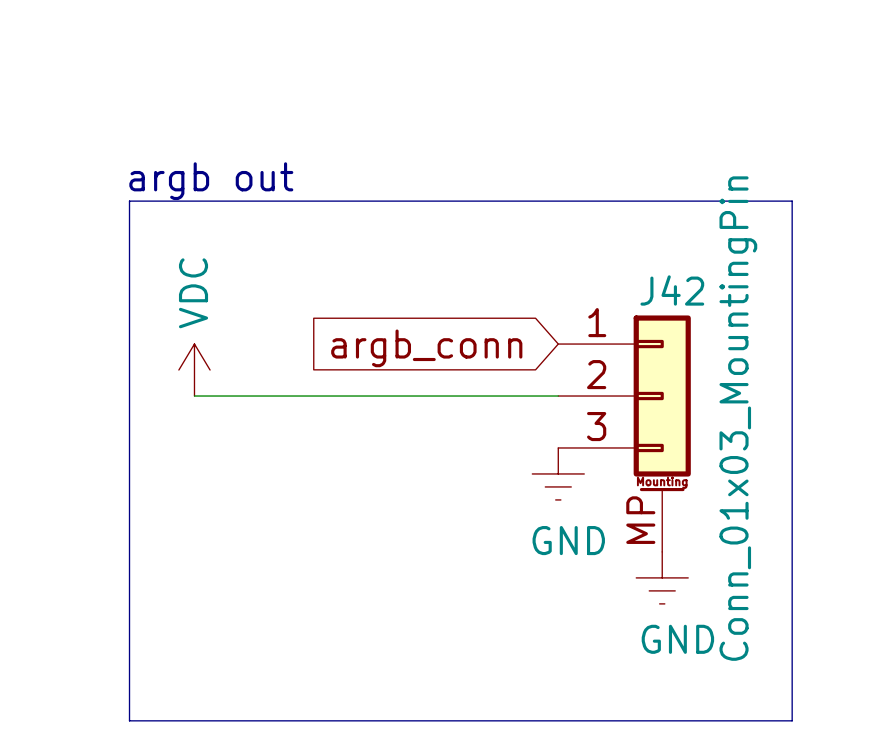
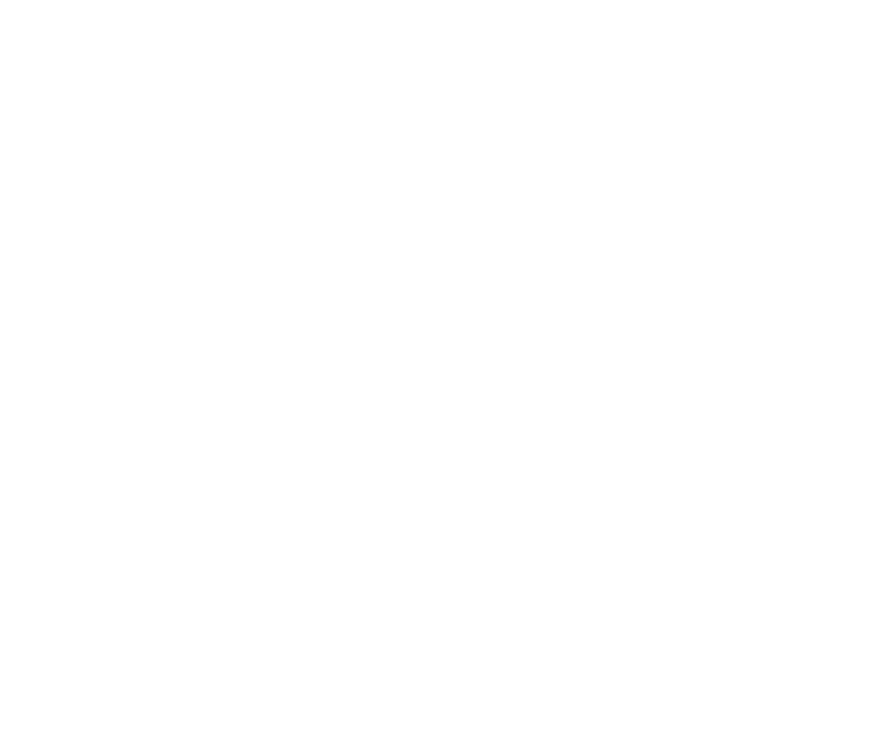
text: argb out (211, 181) -> none
line: (129, 201) (792, 201) (792, 720) (129, 720) (129, 201) -> none
global label: argb_conn (426, 348) -> none
power symbol: VDC (194, 370) -> none
wire: (194, 396) (558, 396) -> none
J42: Conn_01x03_MountingPin (624, 433) -> none
power symbol: GND (558, 473) -> none
power symbol: GND (662, 577) -> none

